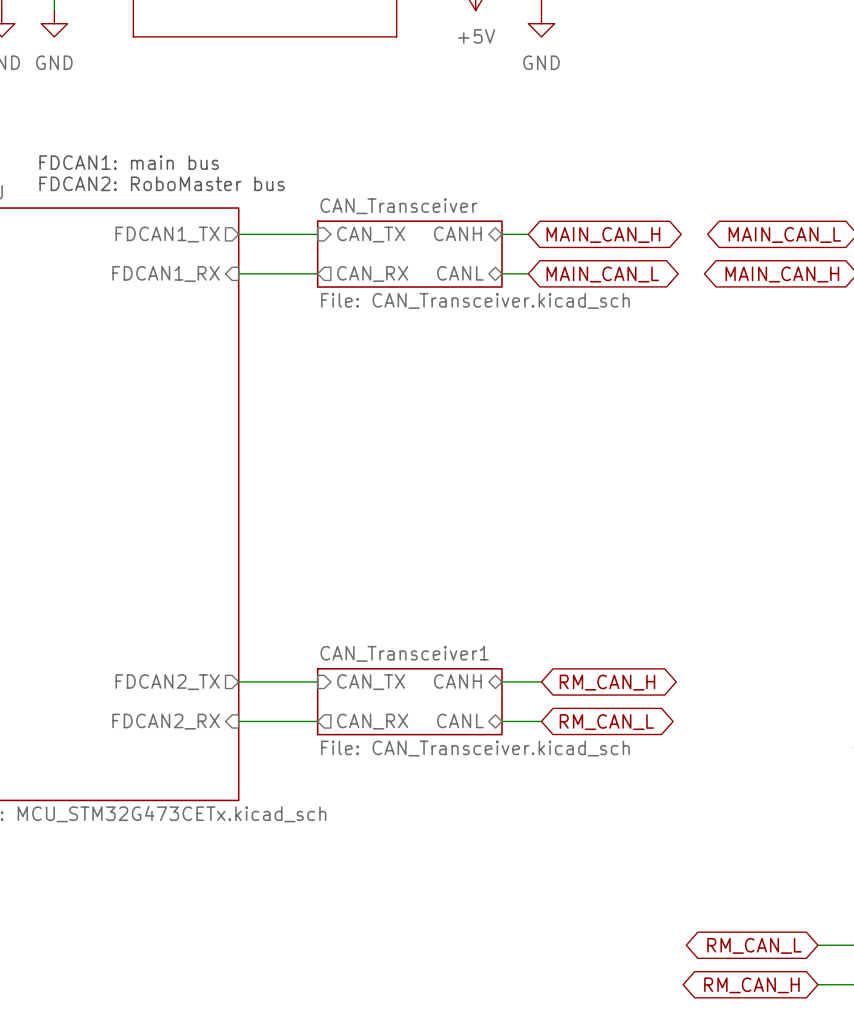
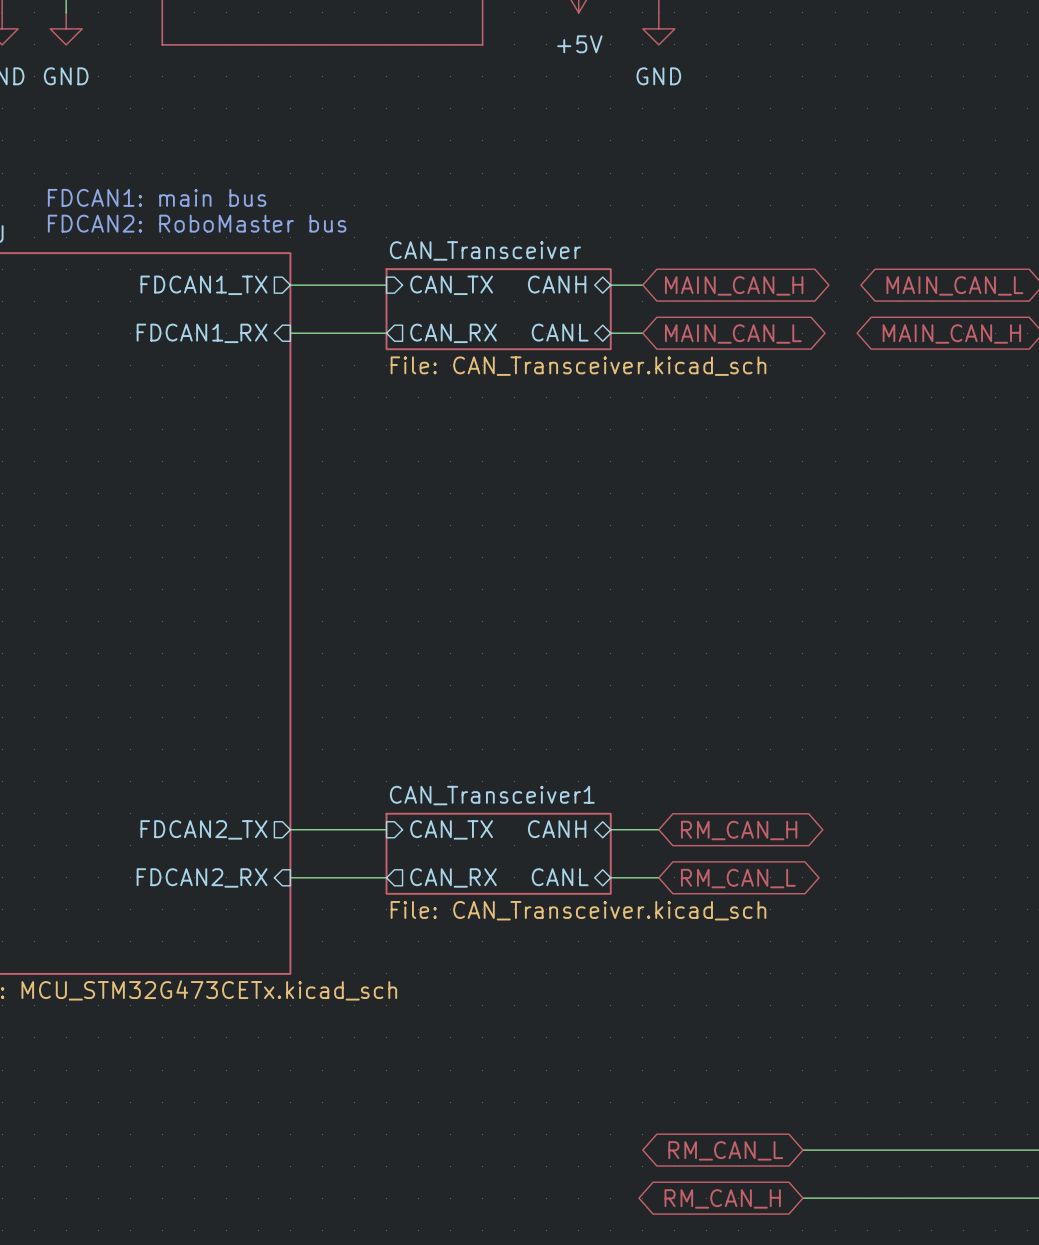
wire: none -> (802, 1150) (995, 1150)
global label position: RM_CAN_L (754, 945) -> RM_CAN_L (725, 1150)
wire: none -> (802, 1198) (995, 1198)
global label position: RM_CAN_H (751, 985) -> RM_CAN_H (722, 1198)

